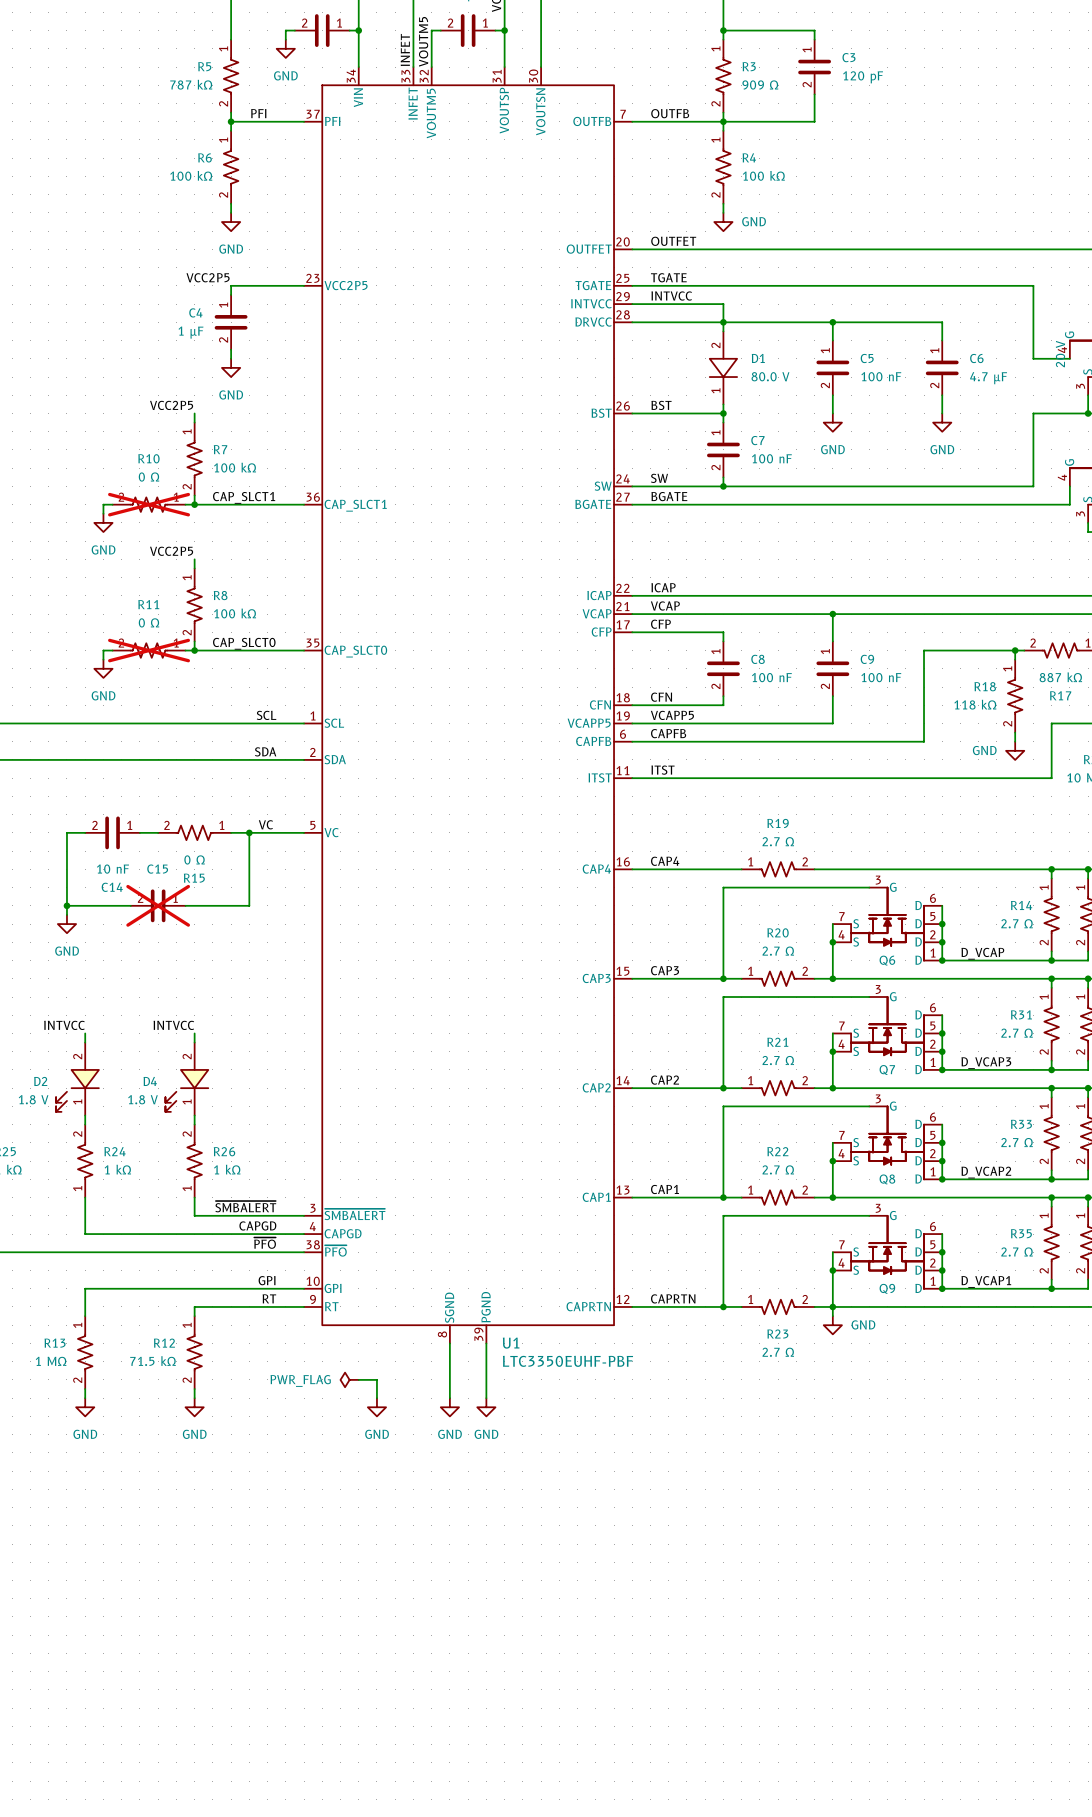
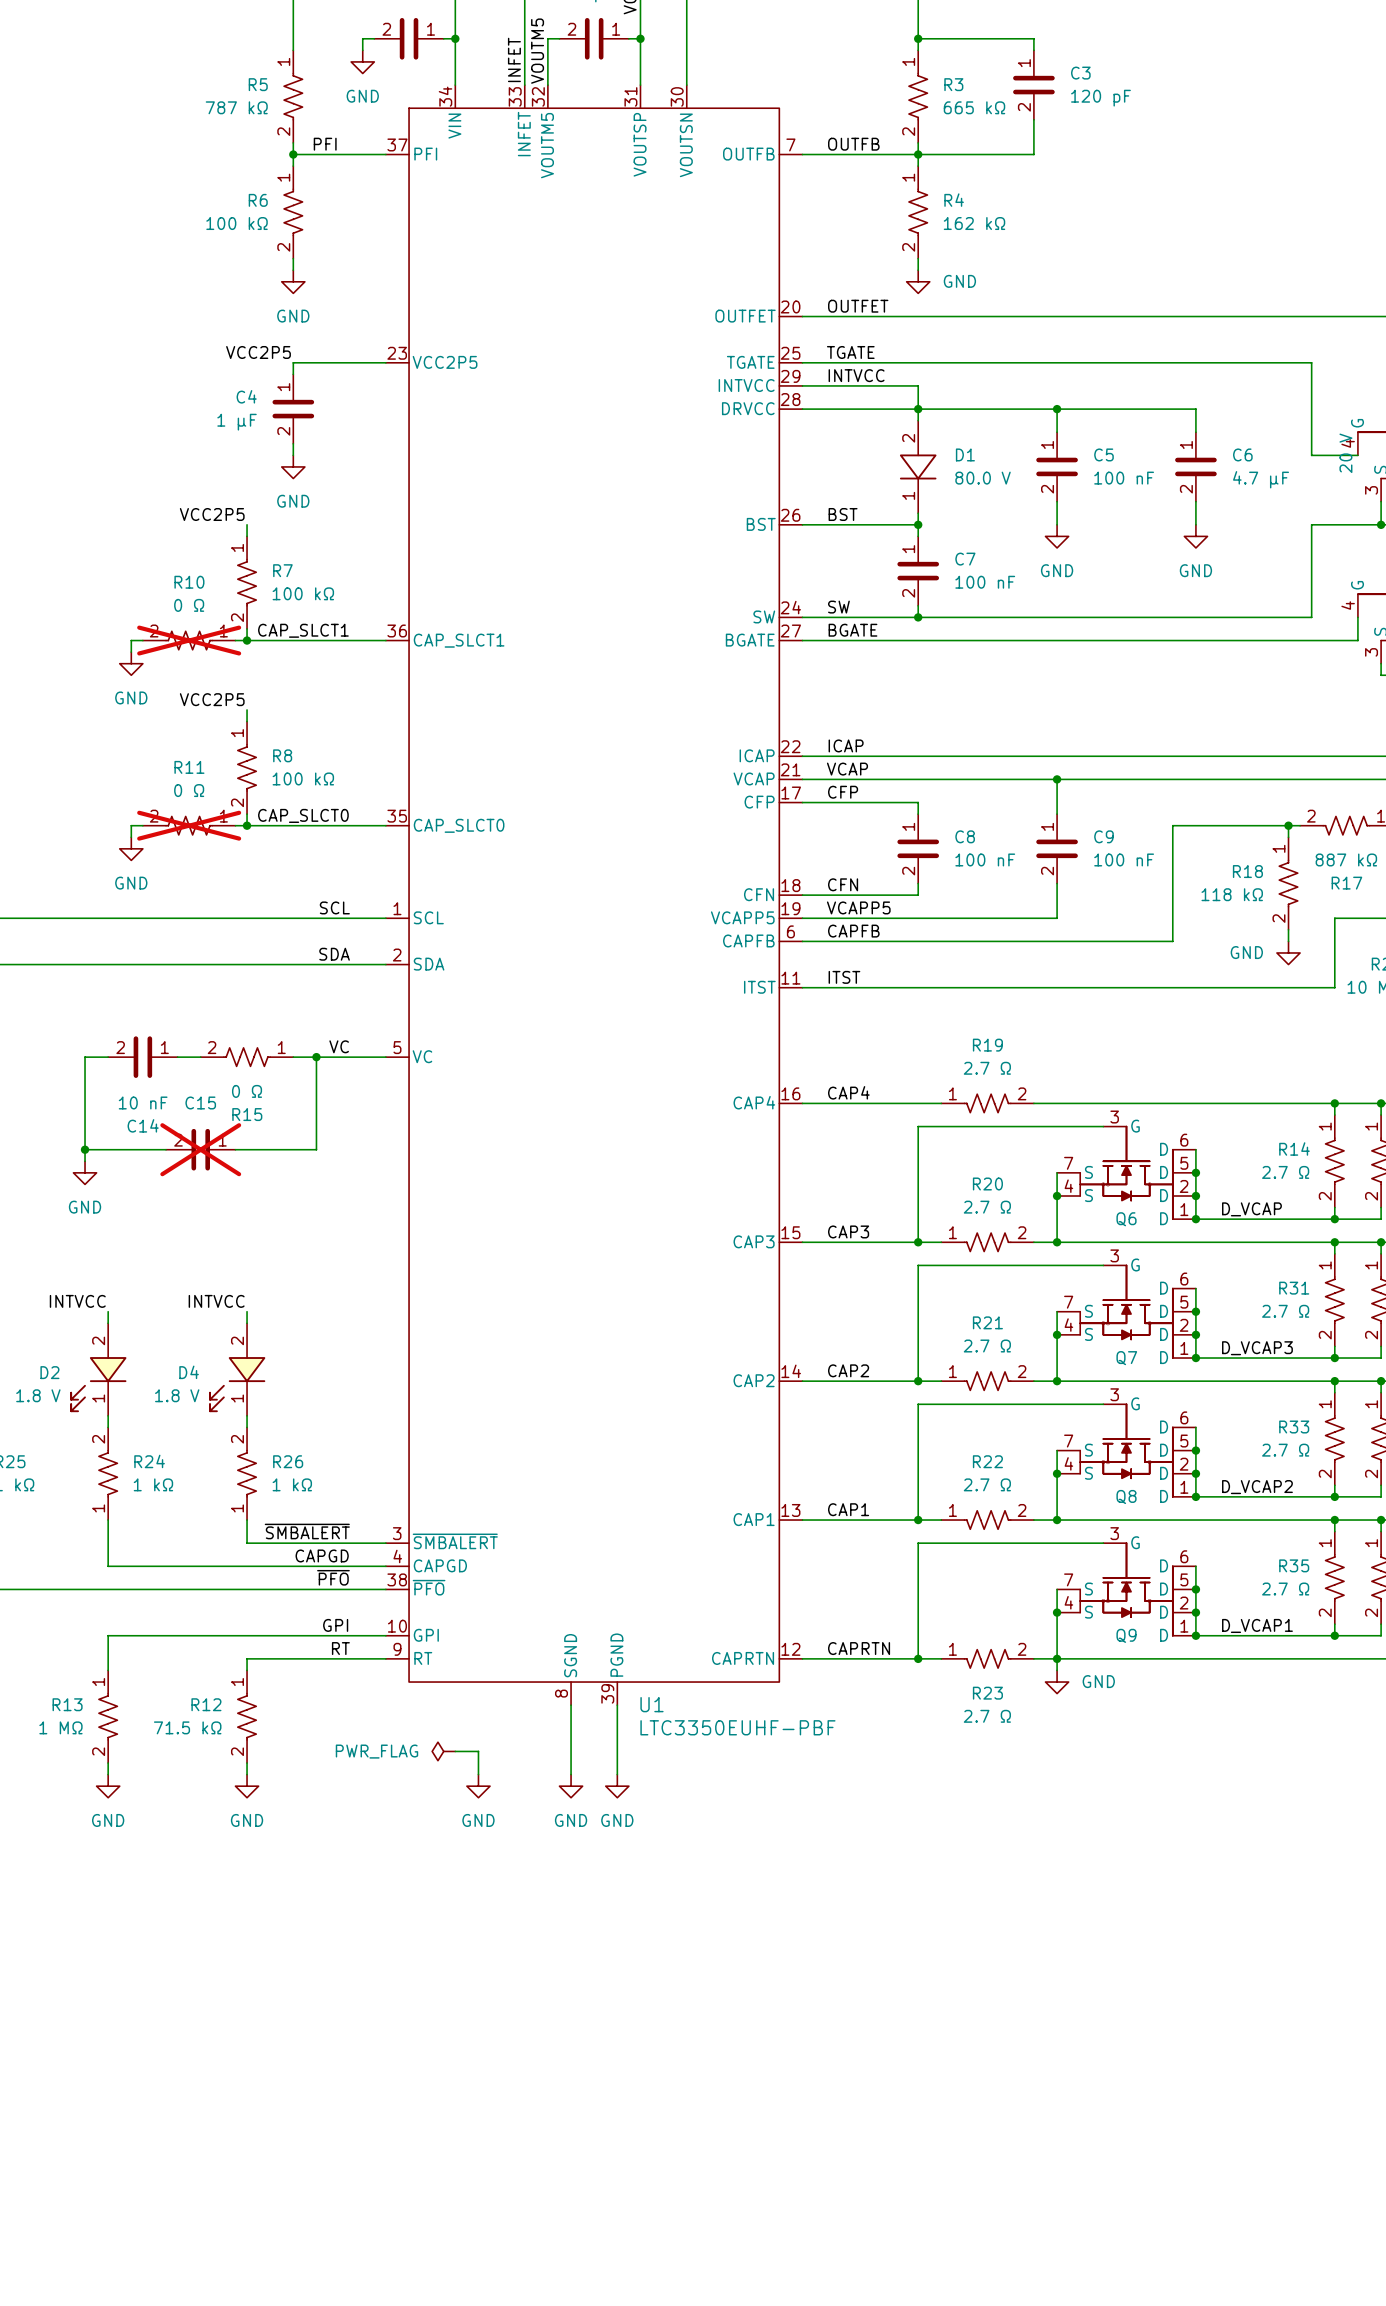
R3 value: 909 Ω (760, 84) -> 665 kΩ (974, 107)
R4 value: 100 kΩ (763, 175) -> 162 kΩ (974, 223)

